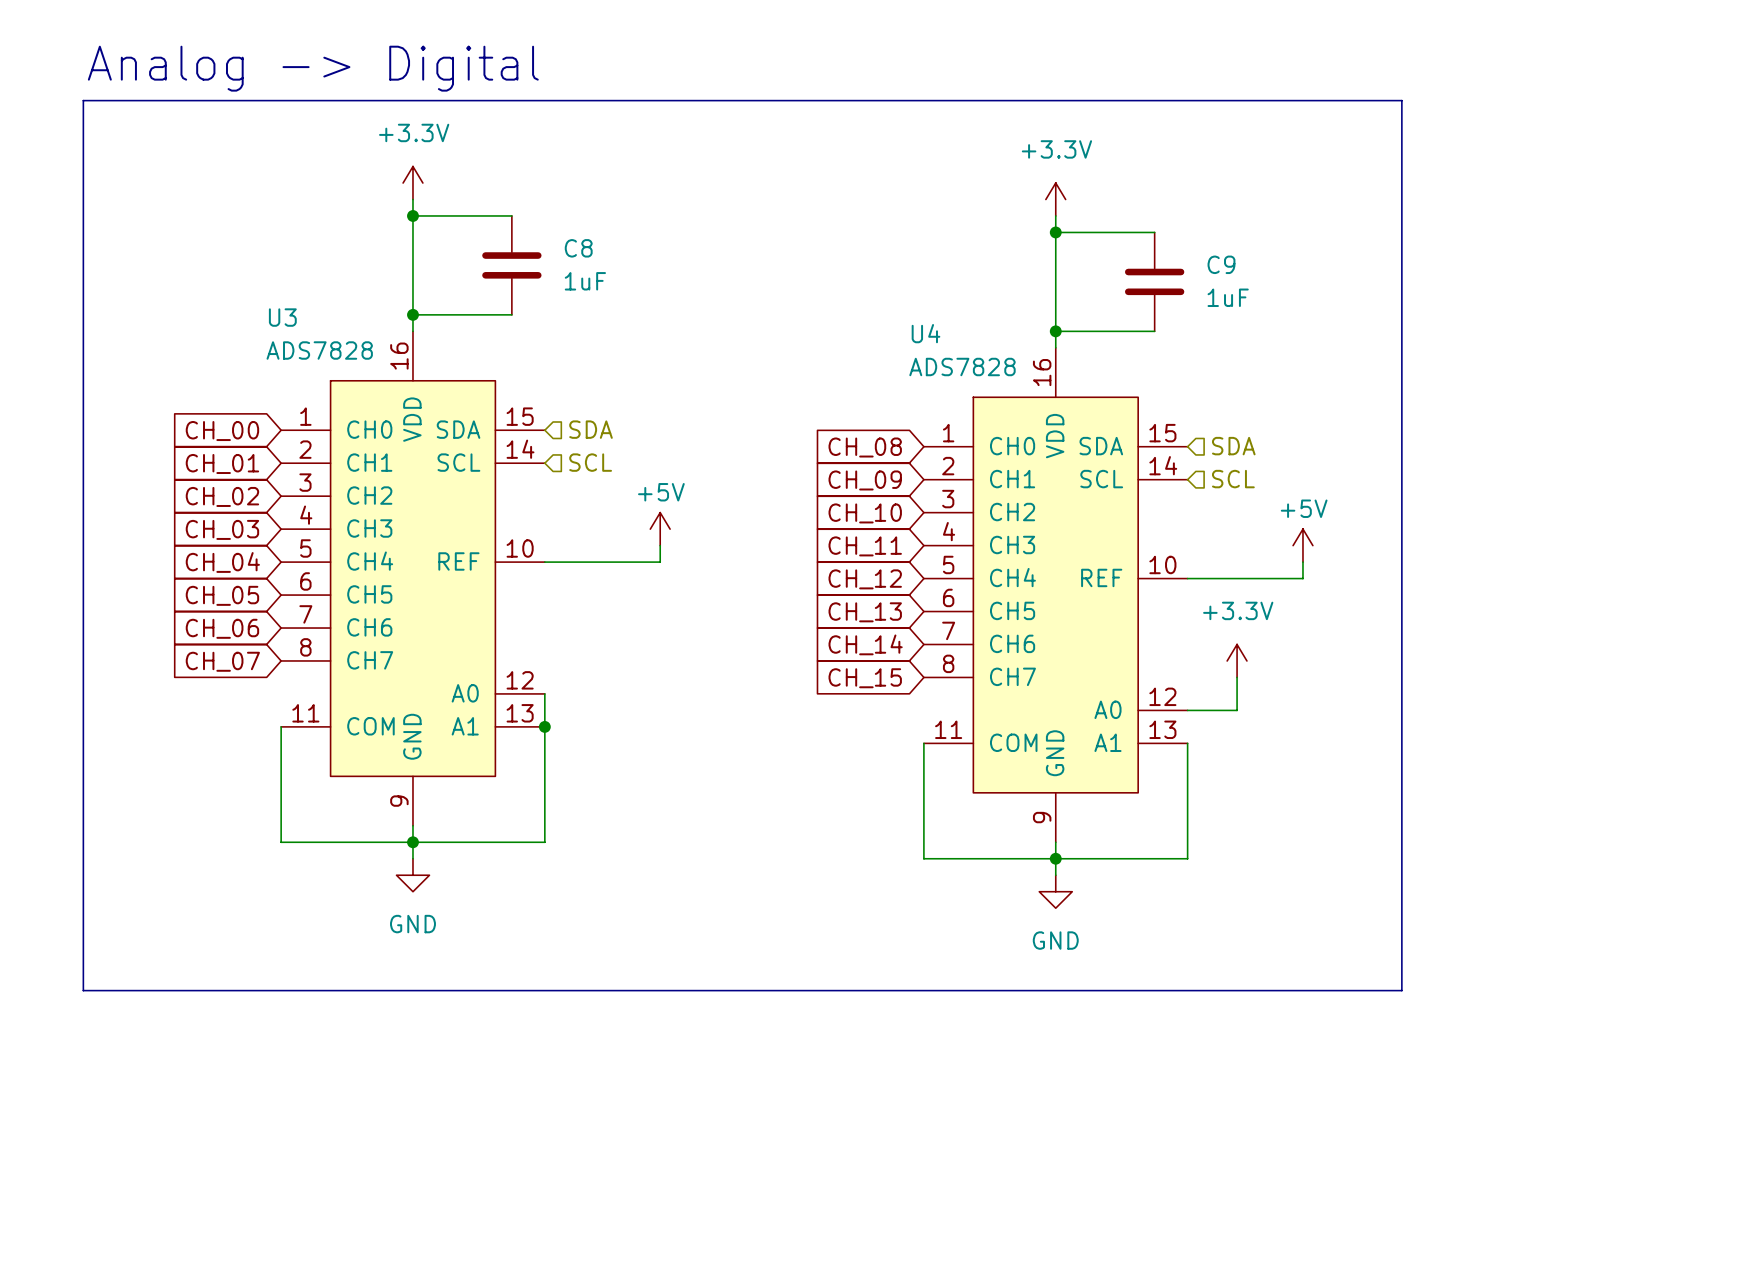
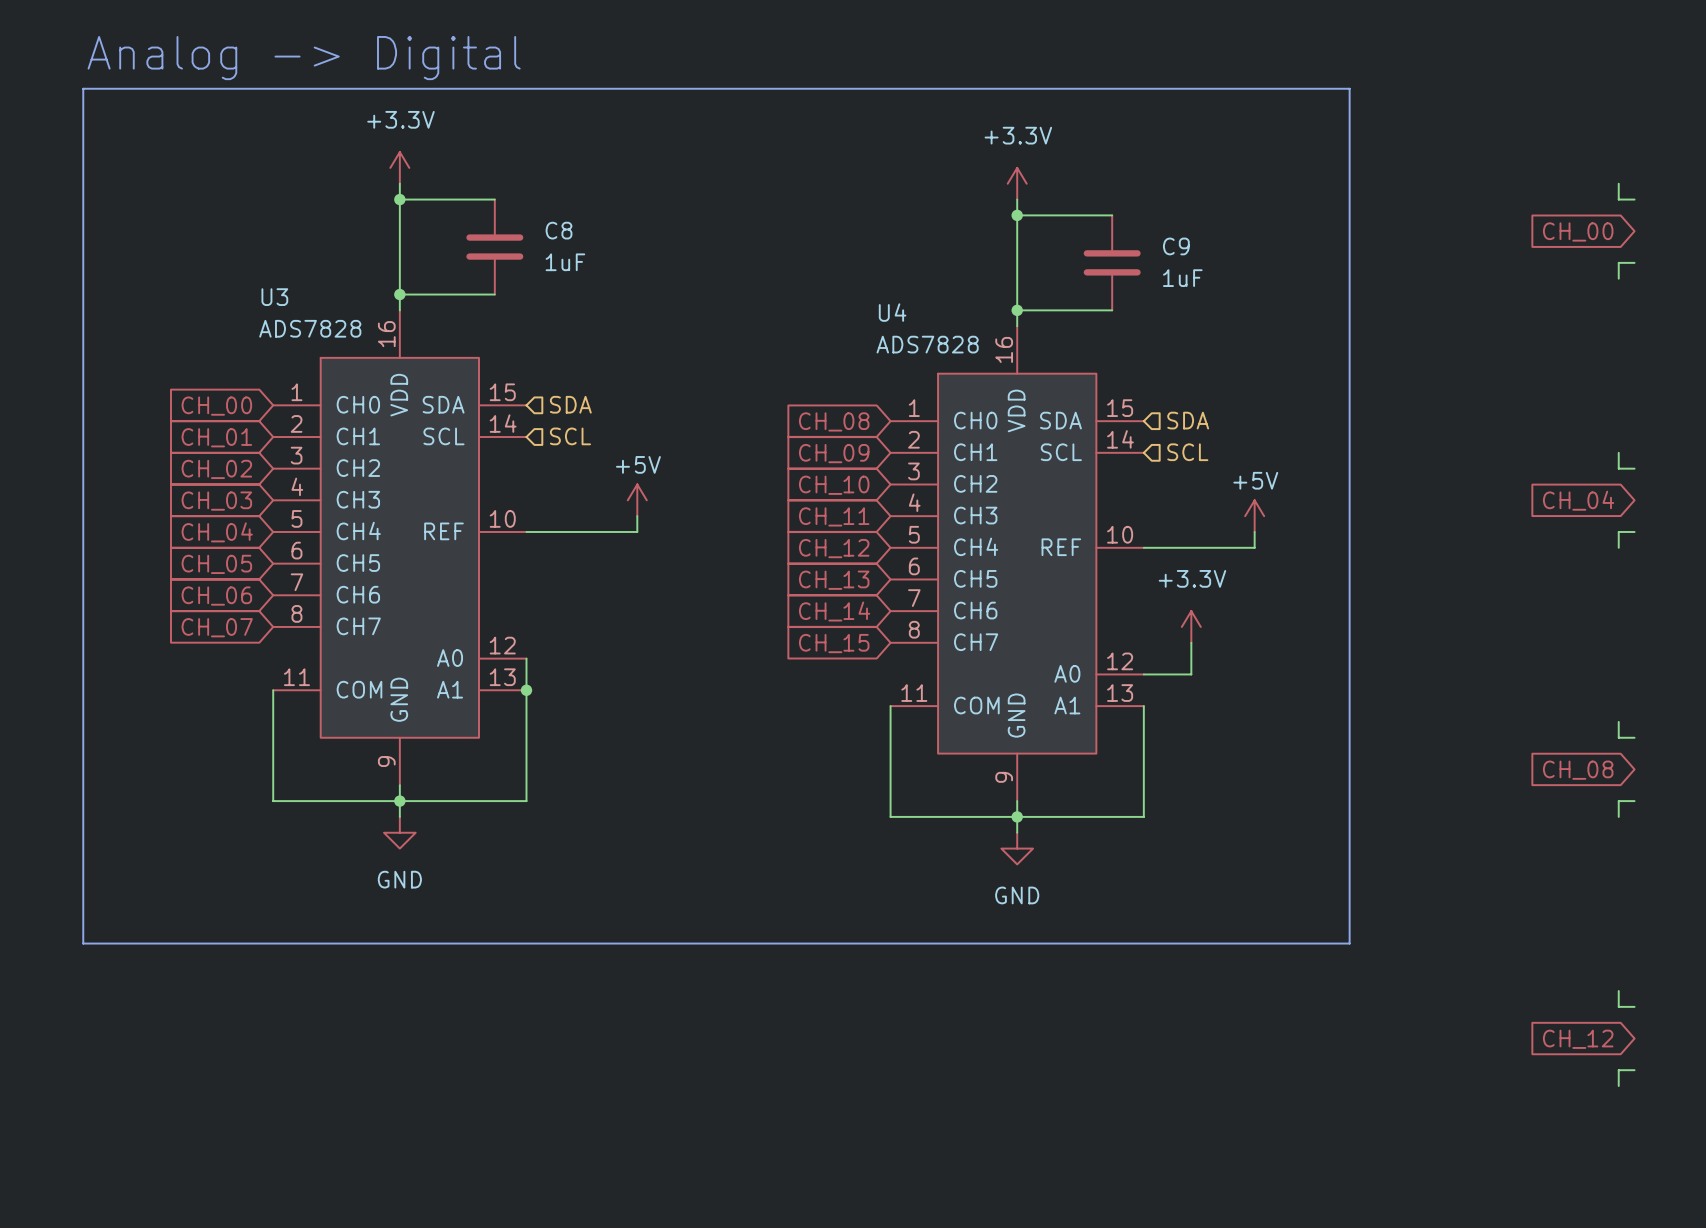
wire: none -> (1618, 183) (1618, 199) (1634, 199)
global label: none -> CH_00 (1578, 231)
wire: none -> (1634, 262) (1618, 262) (1618, 278)
wire: none -> (1618, 452) (1618, 468) (1634, 468)
global label: none -> CH_04 (1578, 500)
wire: none -> (1634, 531) (1618, 531) (1618, 547)
wire: none -> (1618, 721) (1618, 737) (1634, 737)
global label: none -> CH_08 (1578, 770)
wire: none -> (1634, 801) (1618, 801) (1618, 816)
wire: none -> (1618, 991) (1618, 1006) (1634, 1006)
global label: none -> CH_12 (1578, 1039)
wire: none -> (1634, 1070) (1618, 1070) (1618, 1086)

